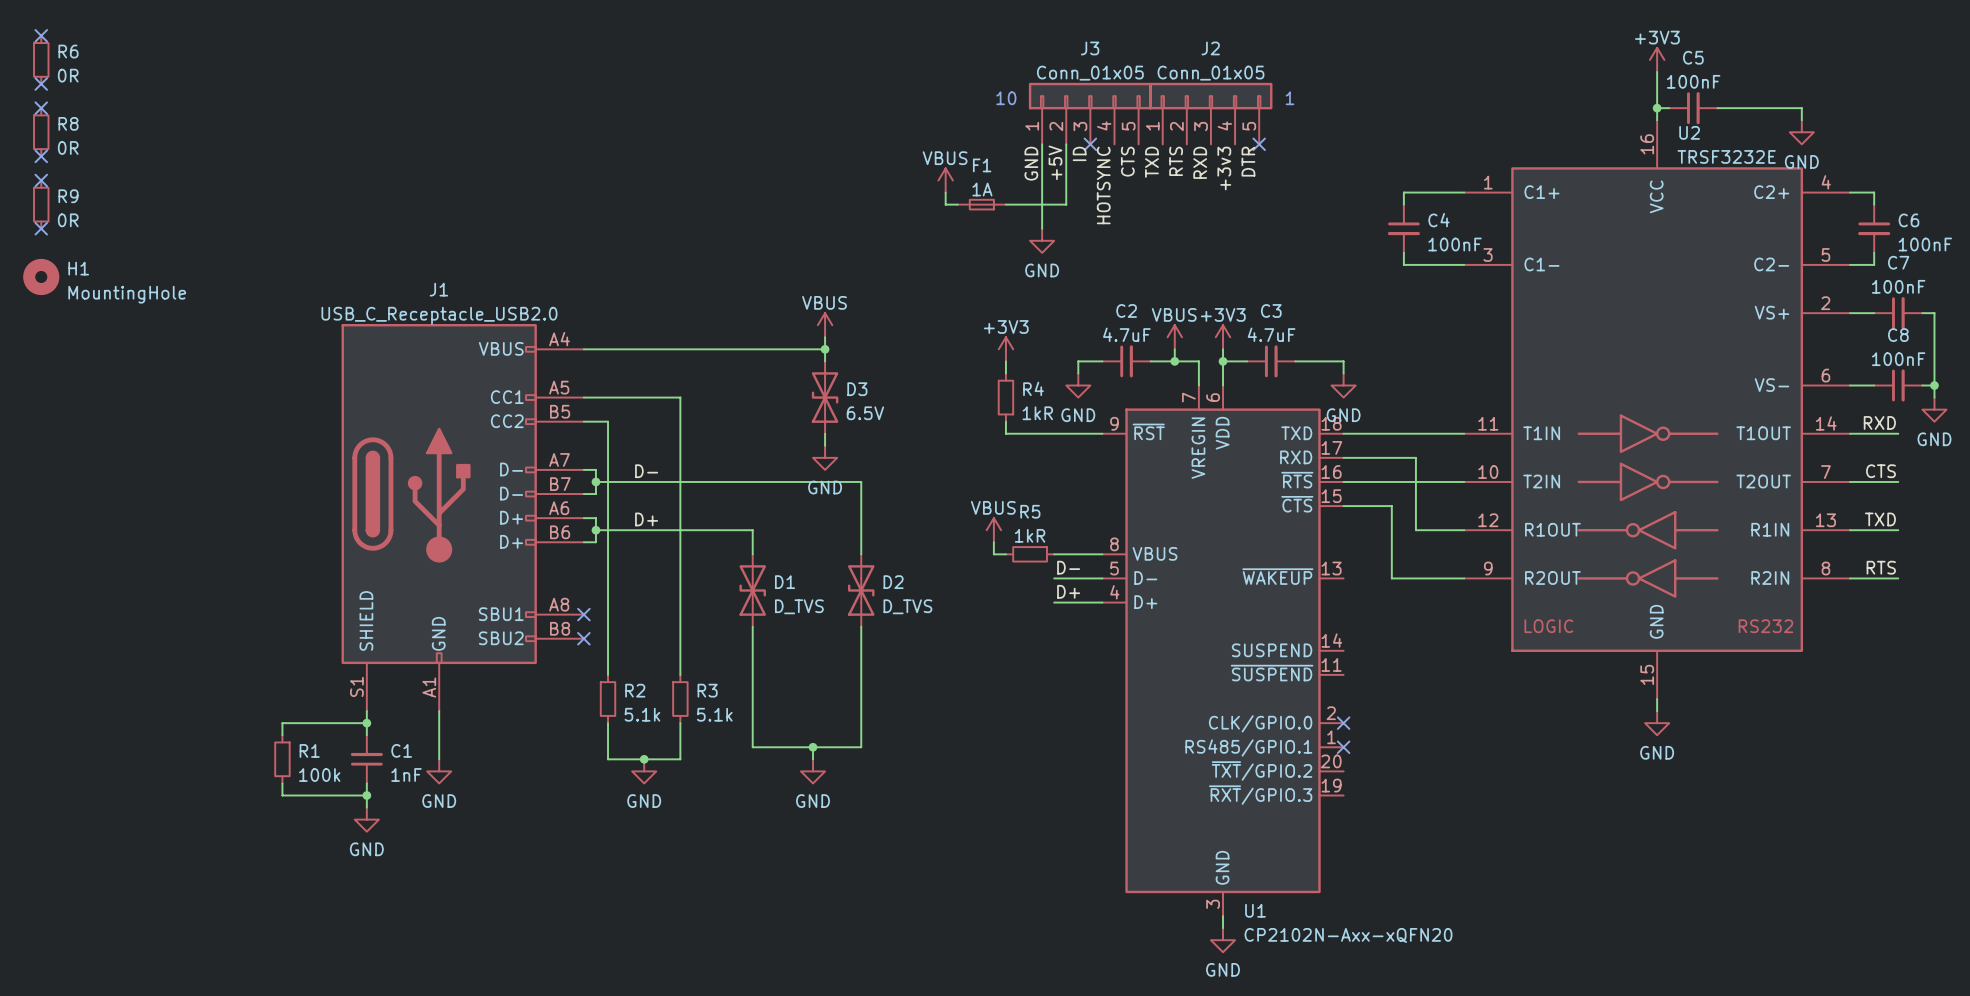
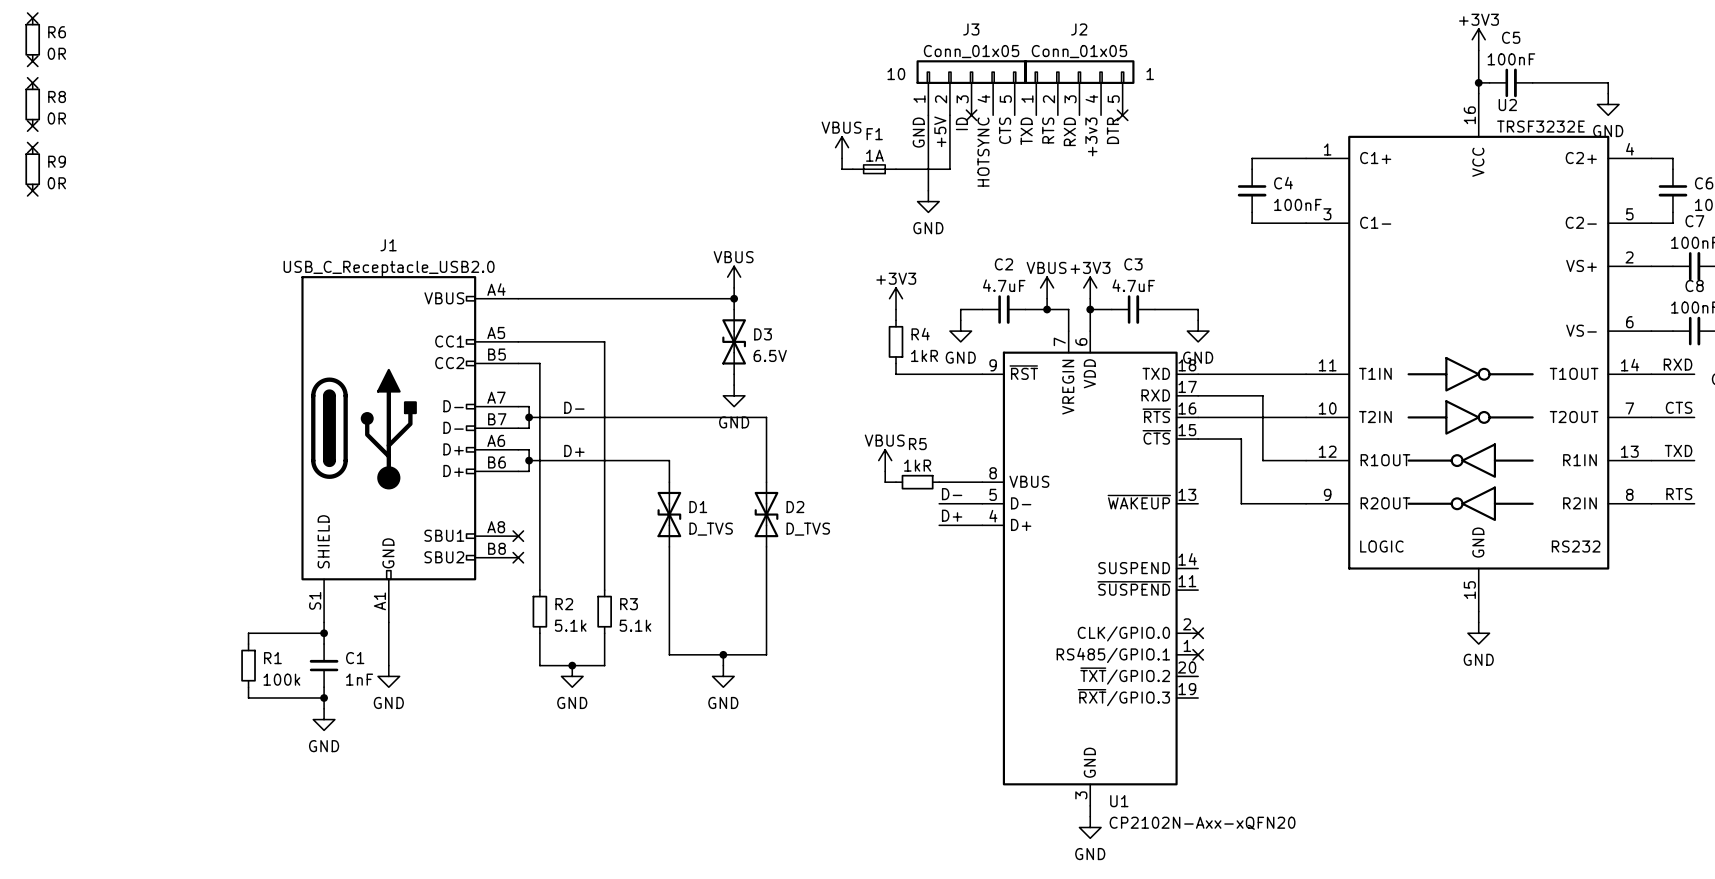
H1: MountingHole (41, 276) -> none

